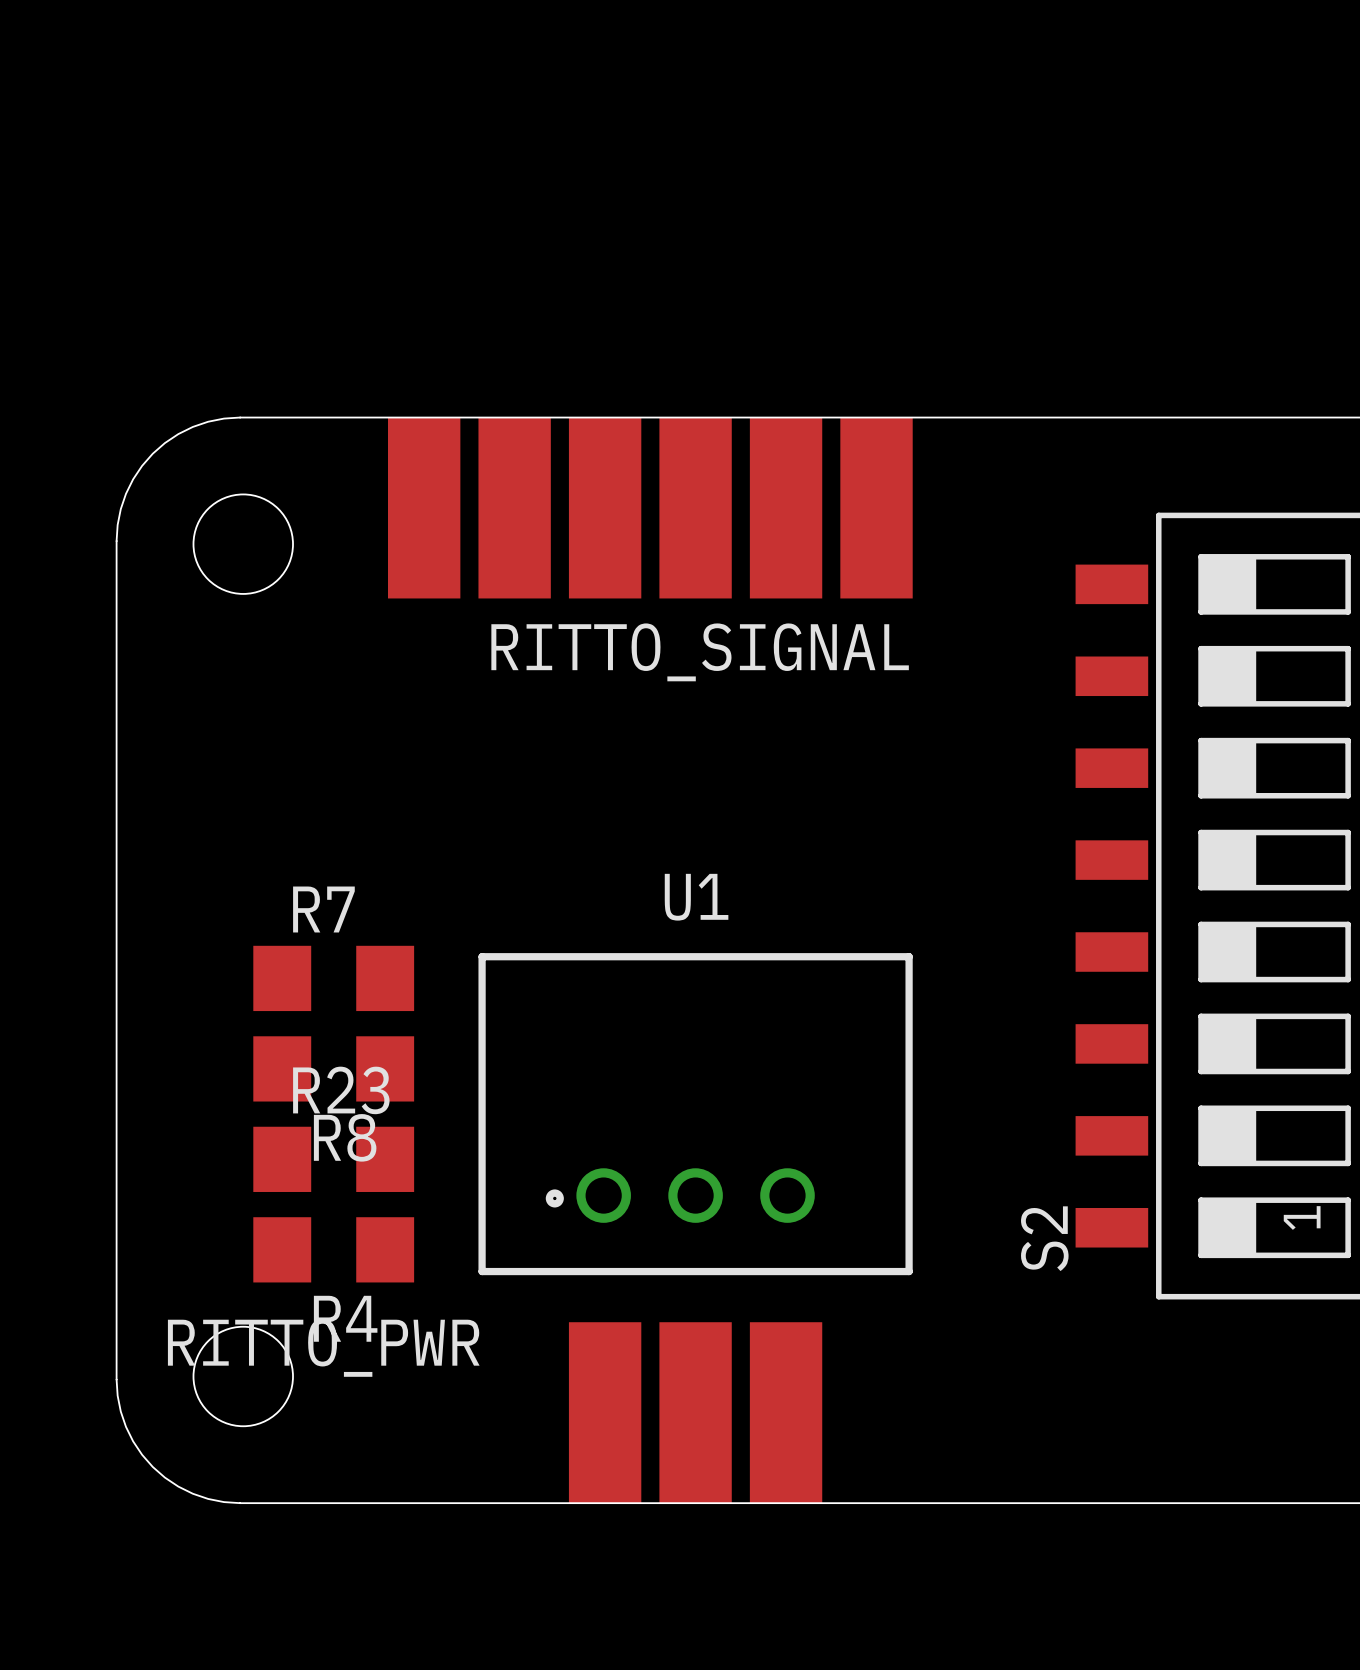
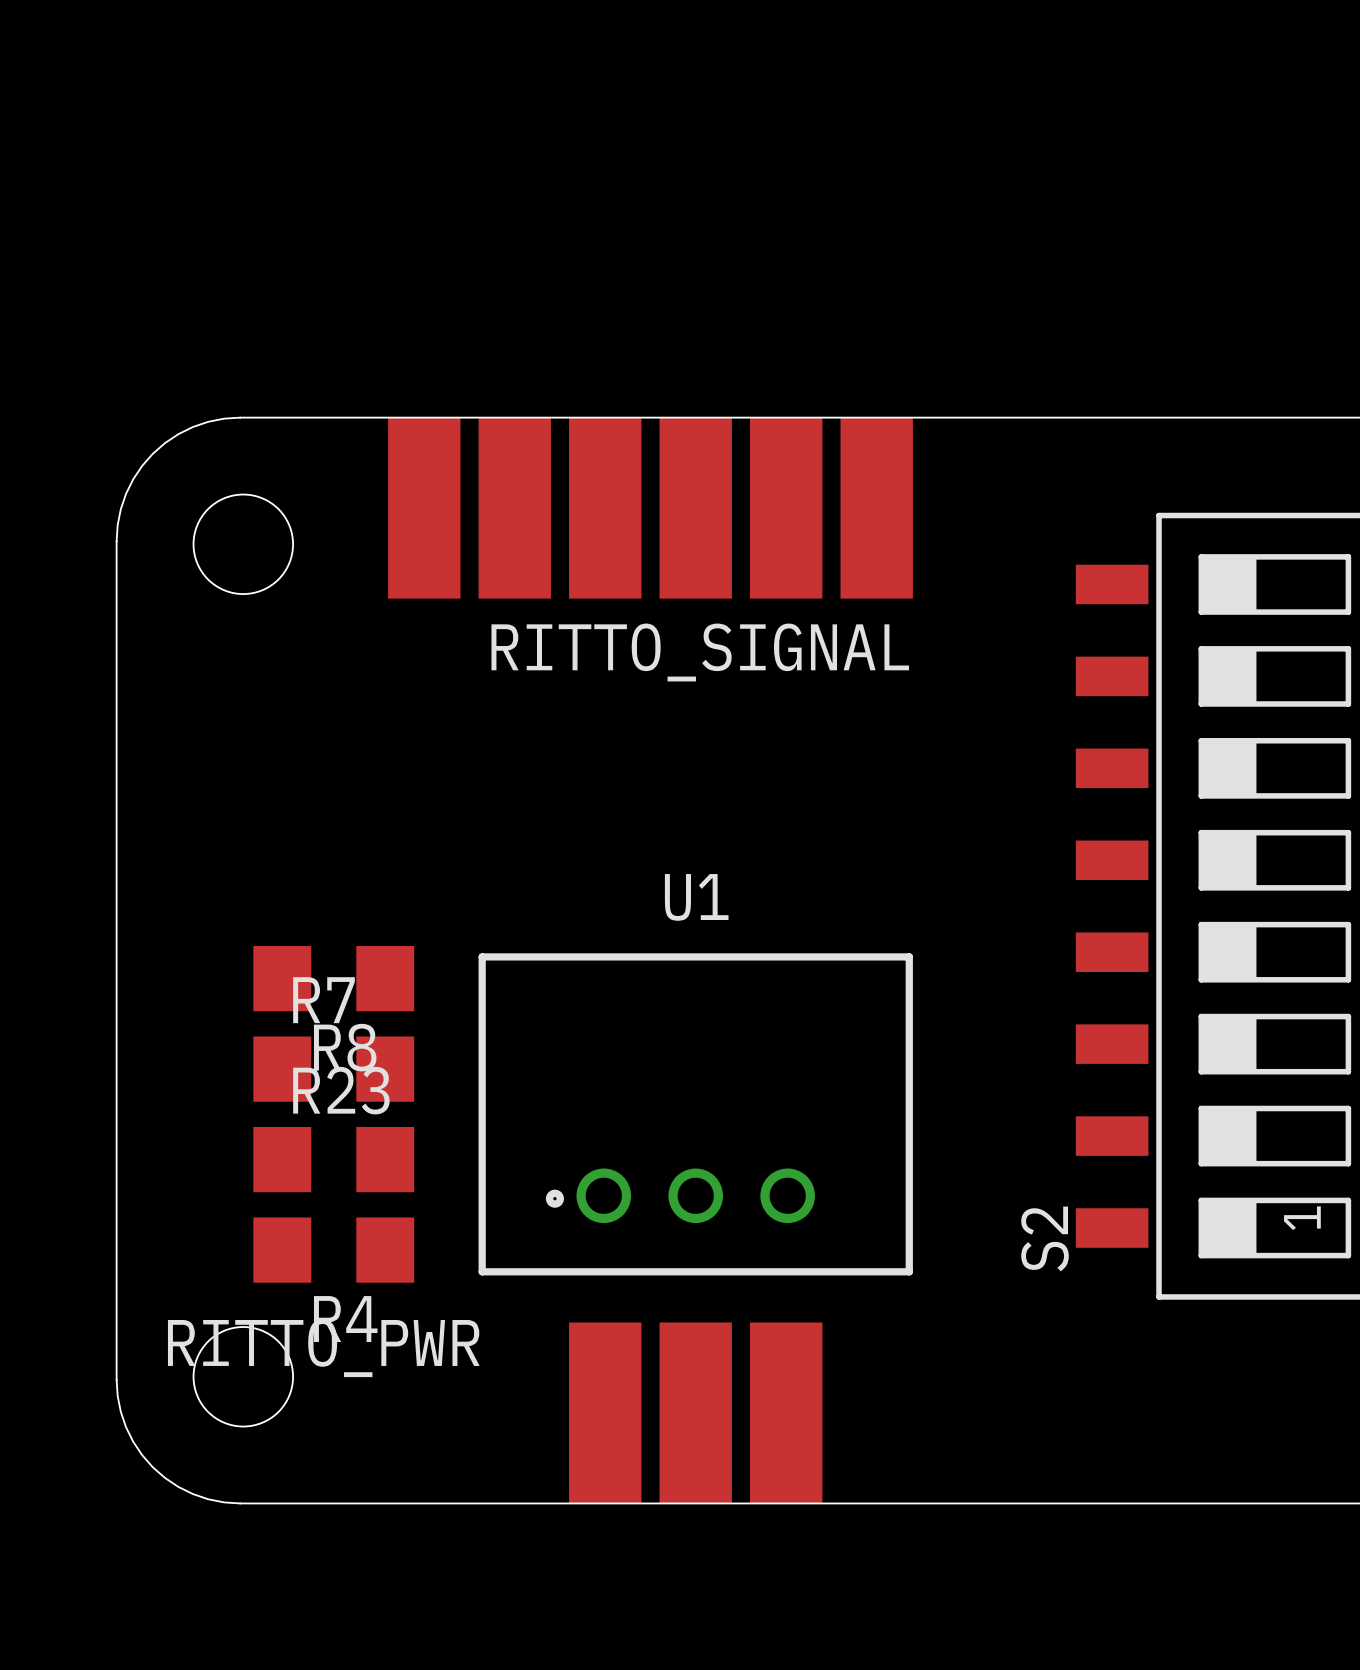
R7 name: R7 (323, 909) -> R8 (345, 1047)
R8 name: R8 (345, 1137) -> R7 (324, 1000)

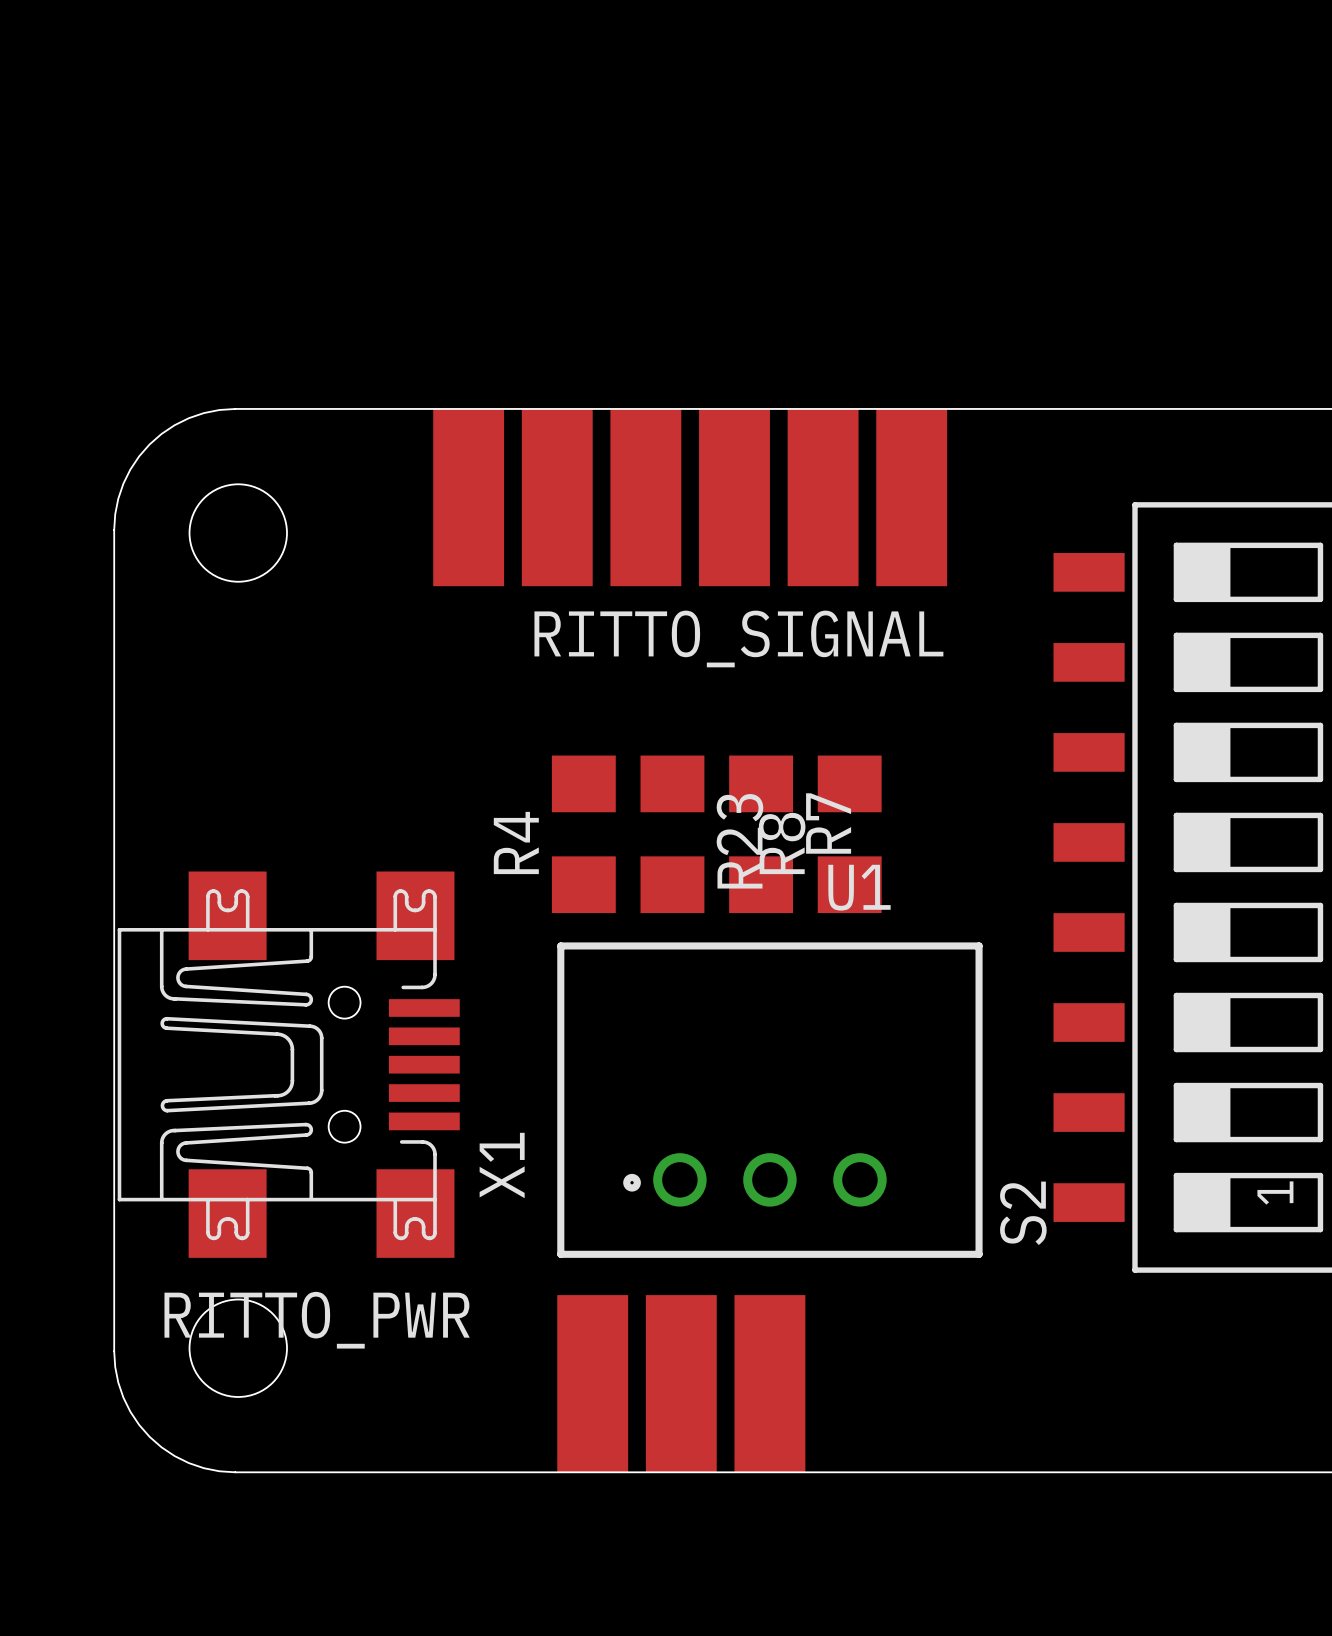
RITTO_SIGNAL position: (650, 508) -> (690, 497)
U1 name position: U1 (696, 897) -> U1 (859, 887)
R8 rotation: 0° (333, 978) -> 90° clockwise (849, 834)
R8 position: (333, 978) -> (849, 834)
R7 rotation: 0° (333, 1069) -> 90° clockwise (761, 834)
R7 position: (333, 1069) -> (761, 834)
X1: none -> (288, 1064)
U1 position: (695, 1114) -> (769, 1100)
R23 rotation: 0° (333, 1159) -> 90° clockwise (672, 834)
R23 position: (333, 1159) -> (672, 834)
R4 rotation: 0° (333, 1250) -> 90° clockwise (583, 834)
R4 position: (333, 1250) -> (583, 834)

